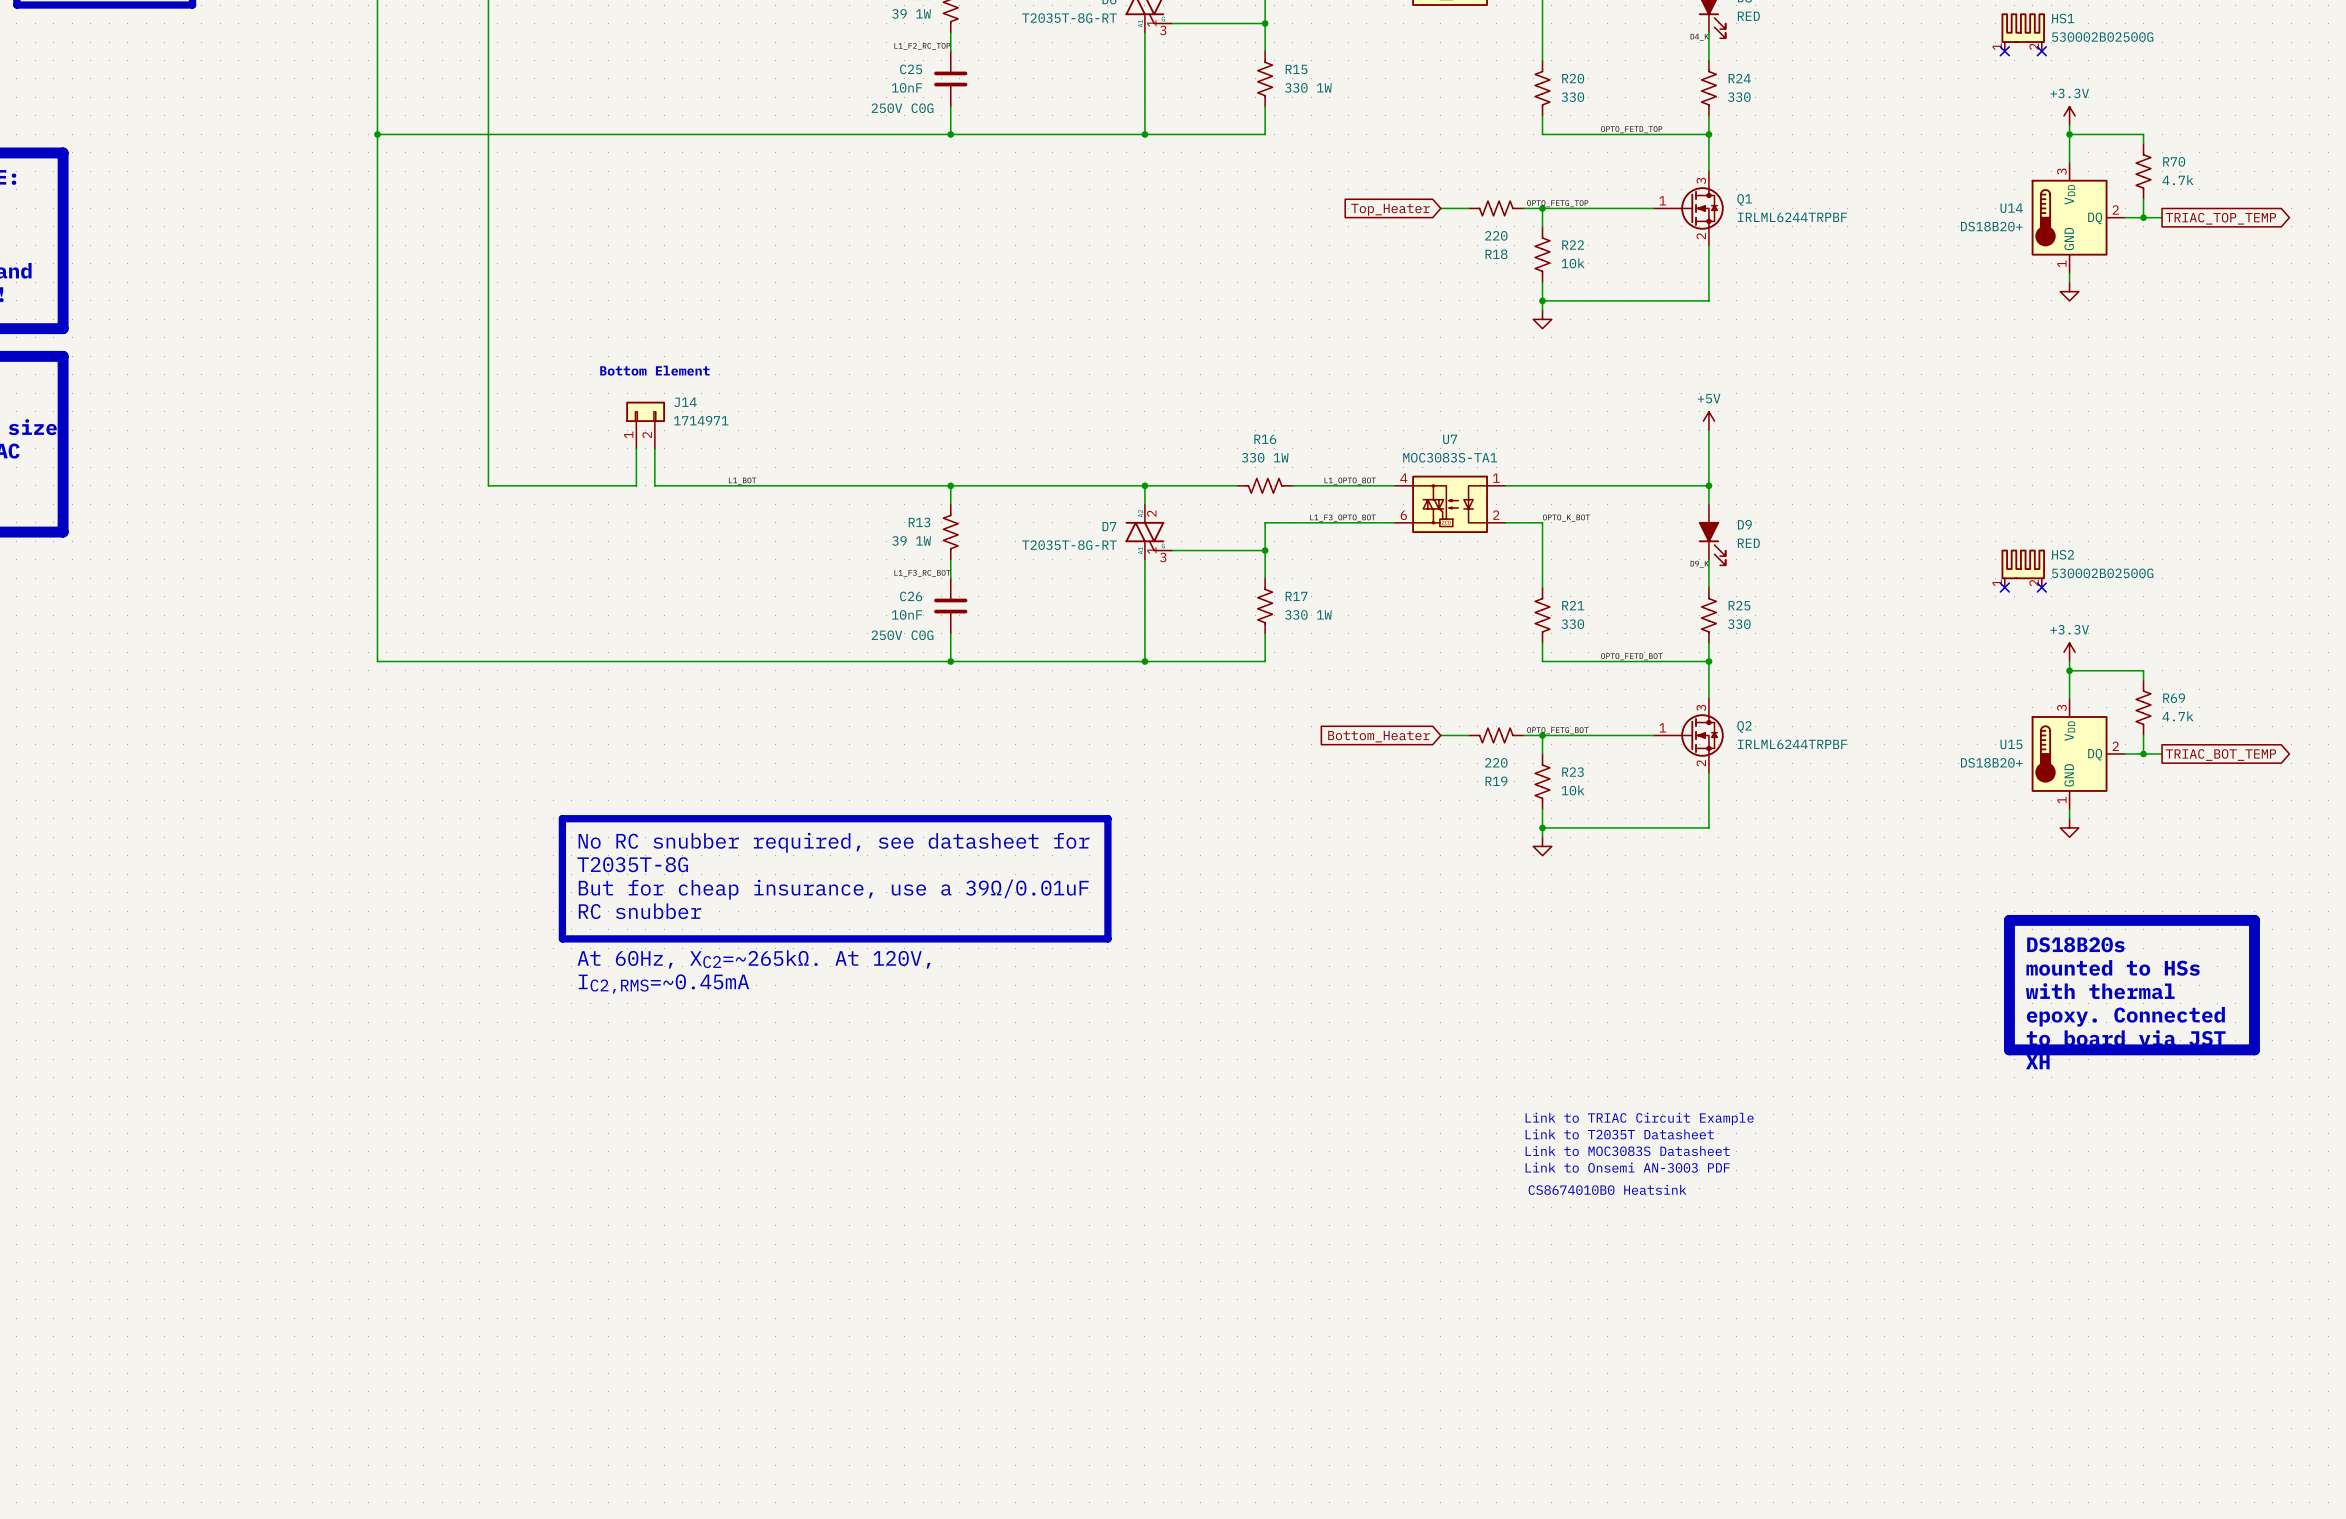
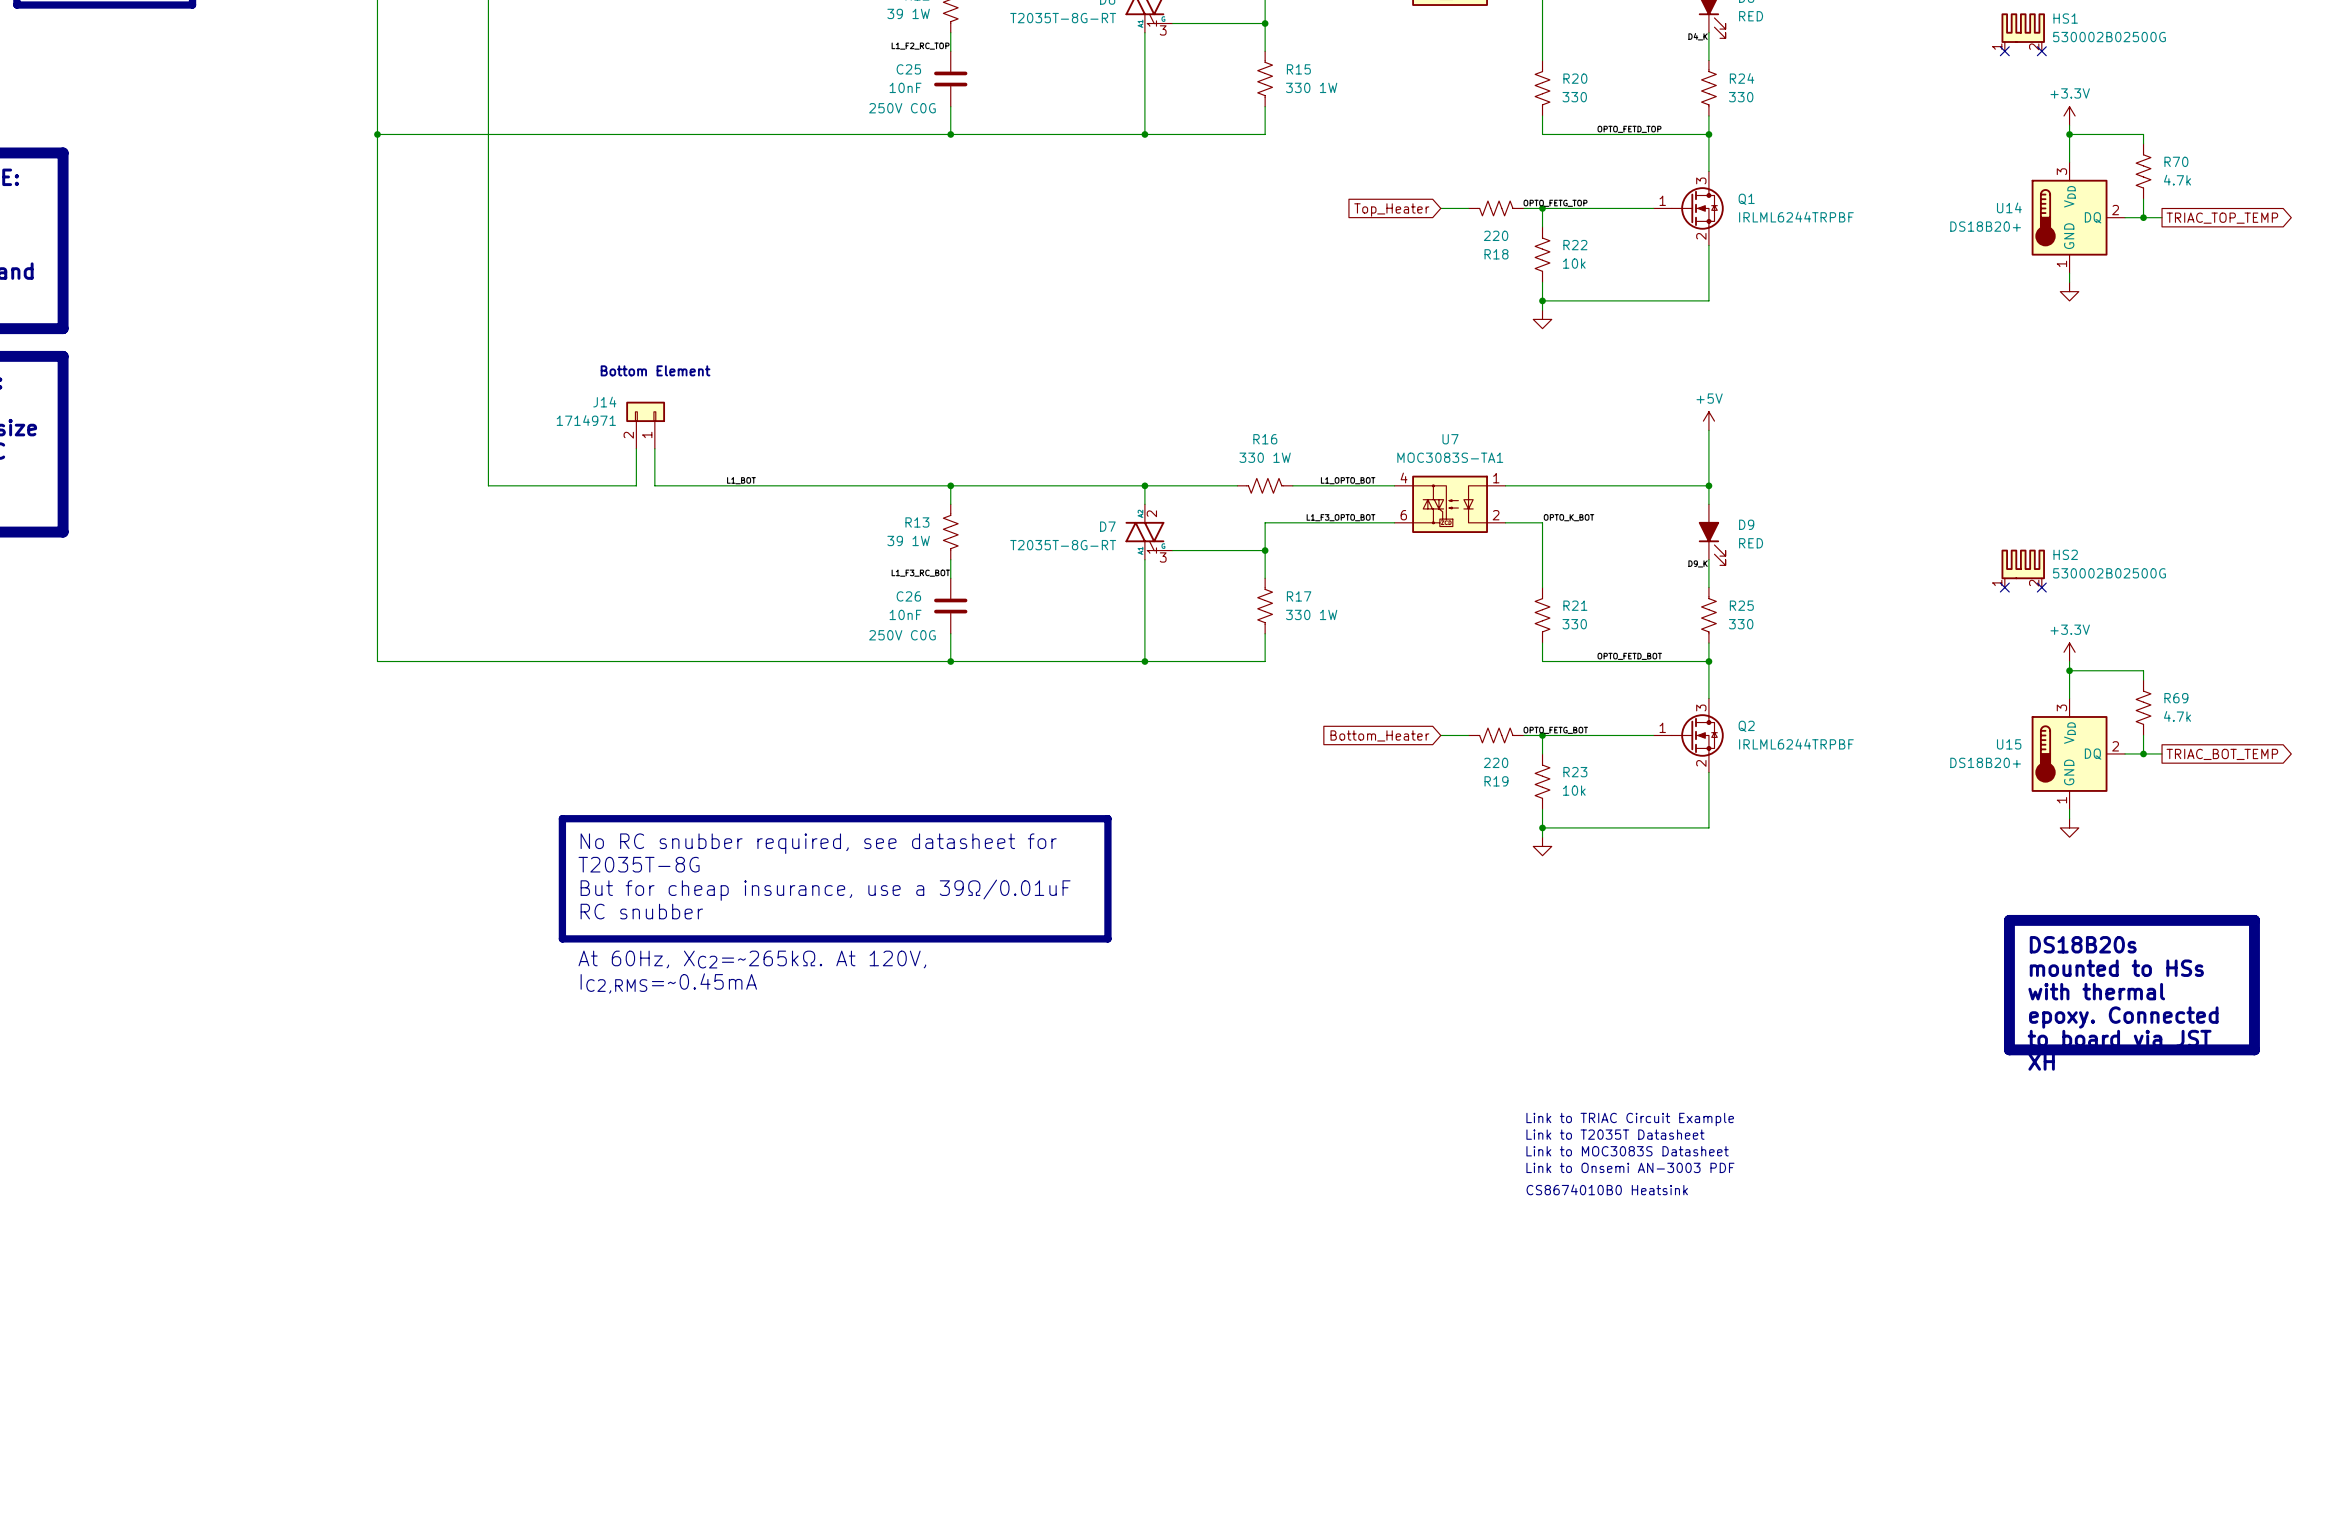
J14 flip: as is (645, 411) -> left-right (645, 411)

